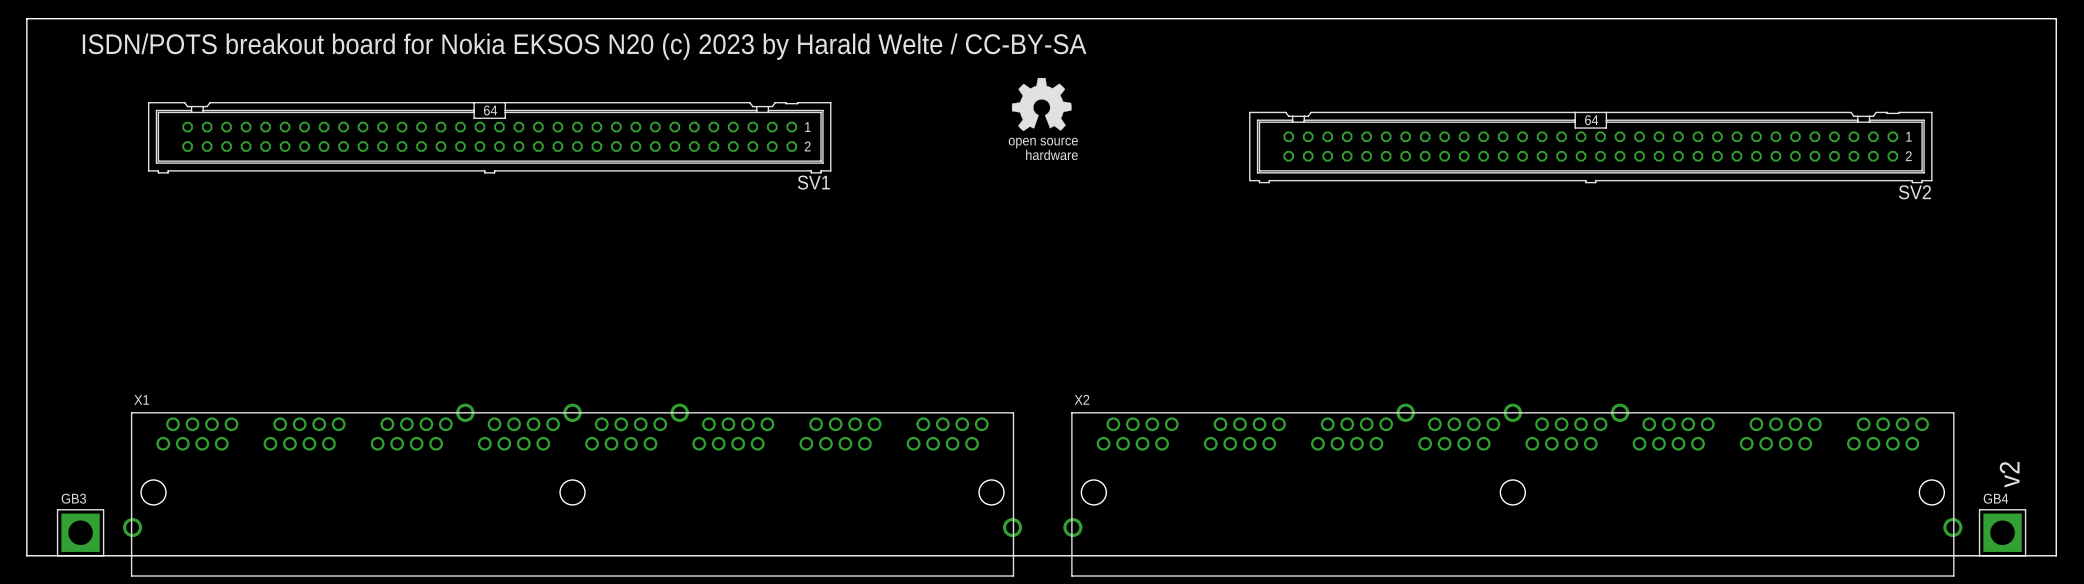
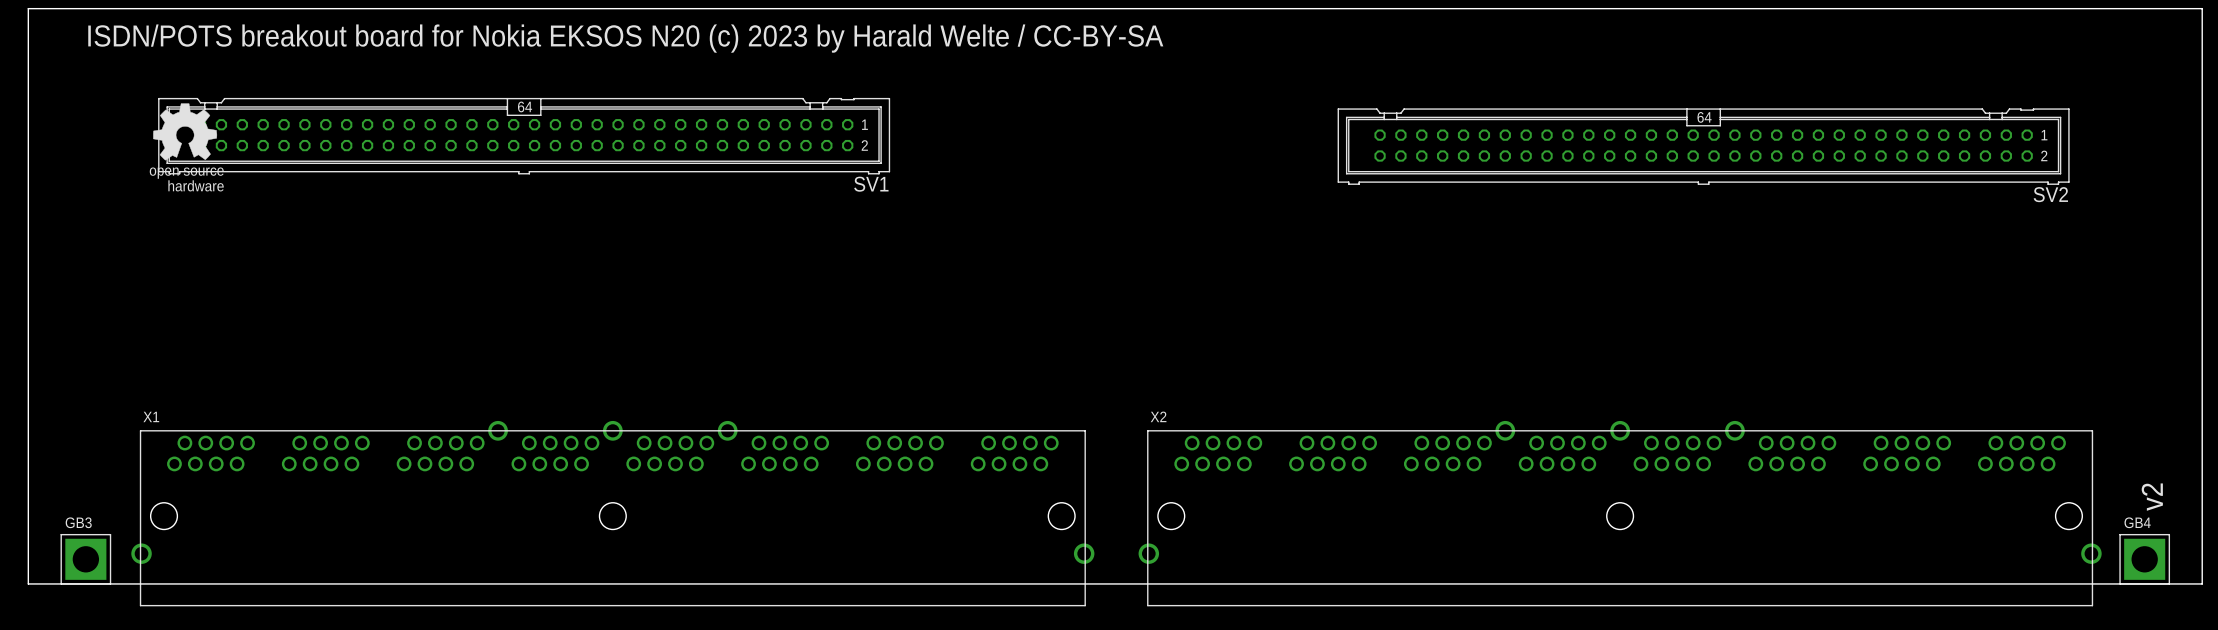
drawing: [1011, 77, 1072, 132] -> none
drawing: none -> [153, 103, 218, 161]

